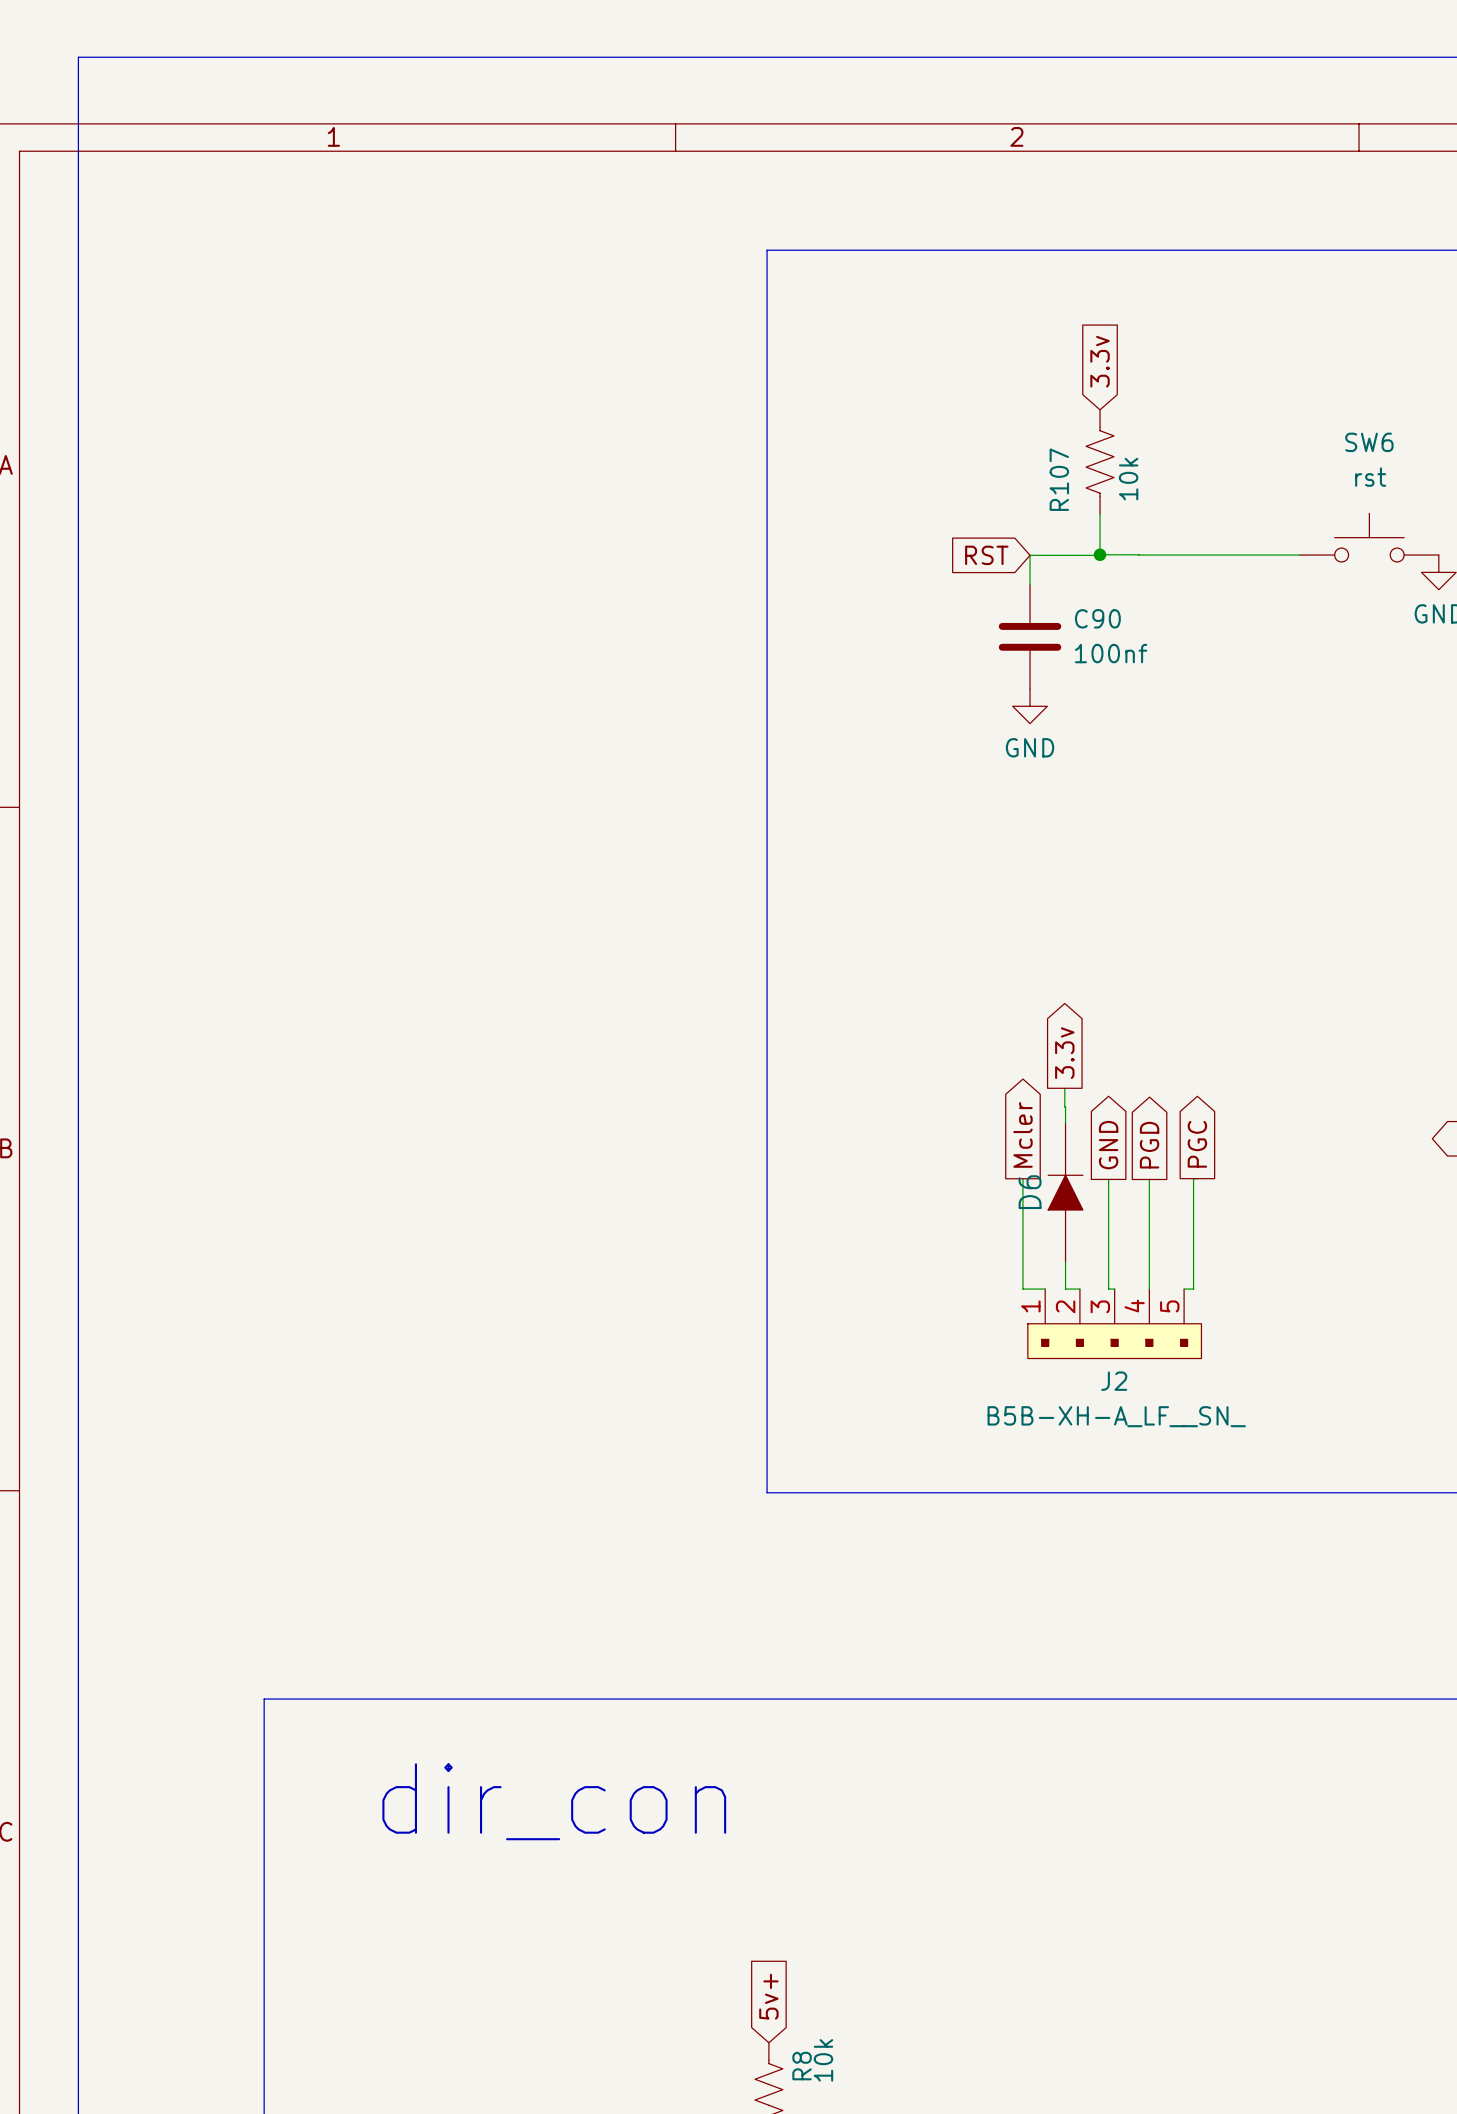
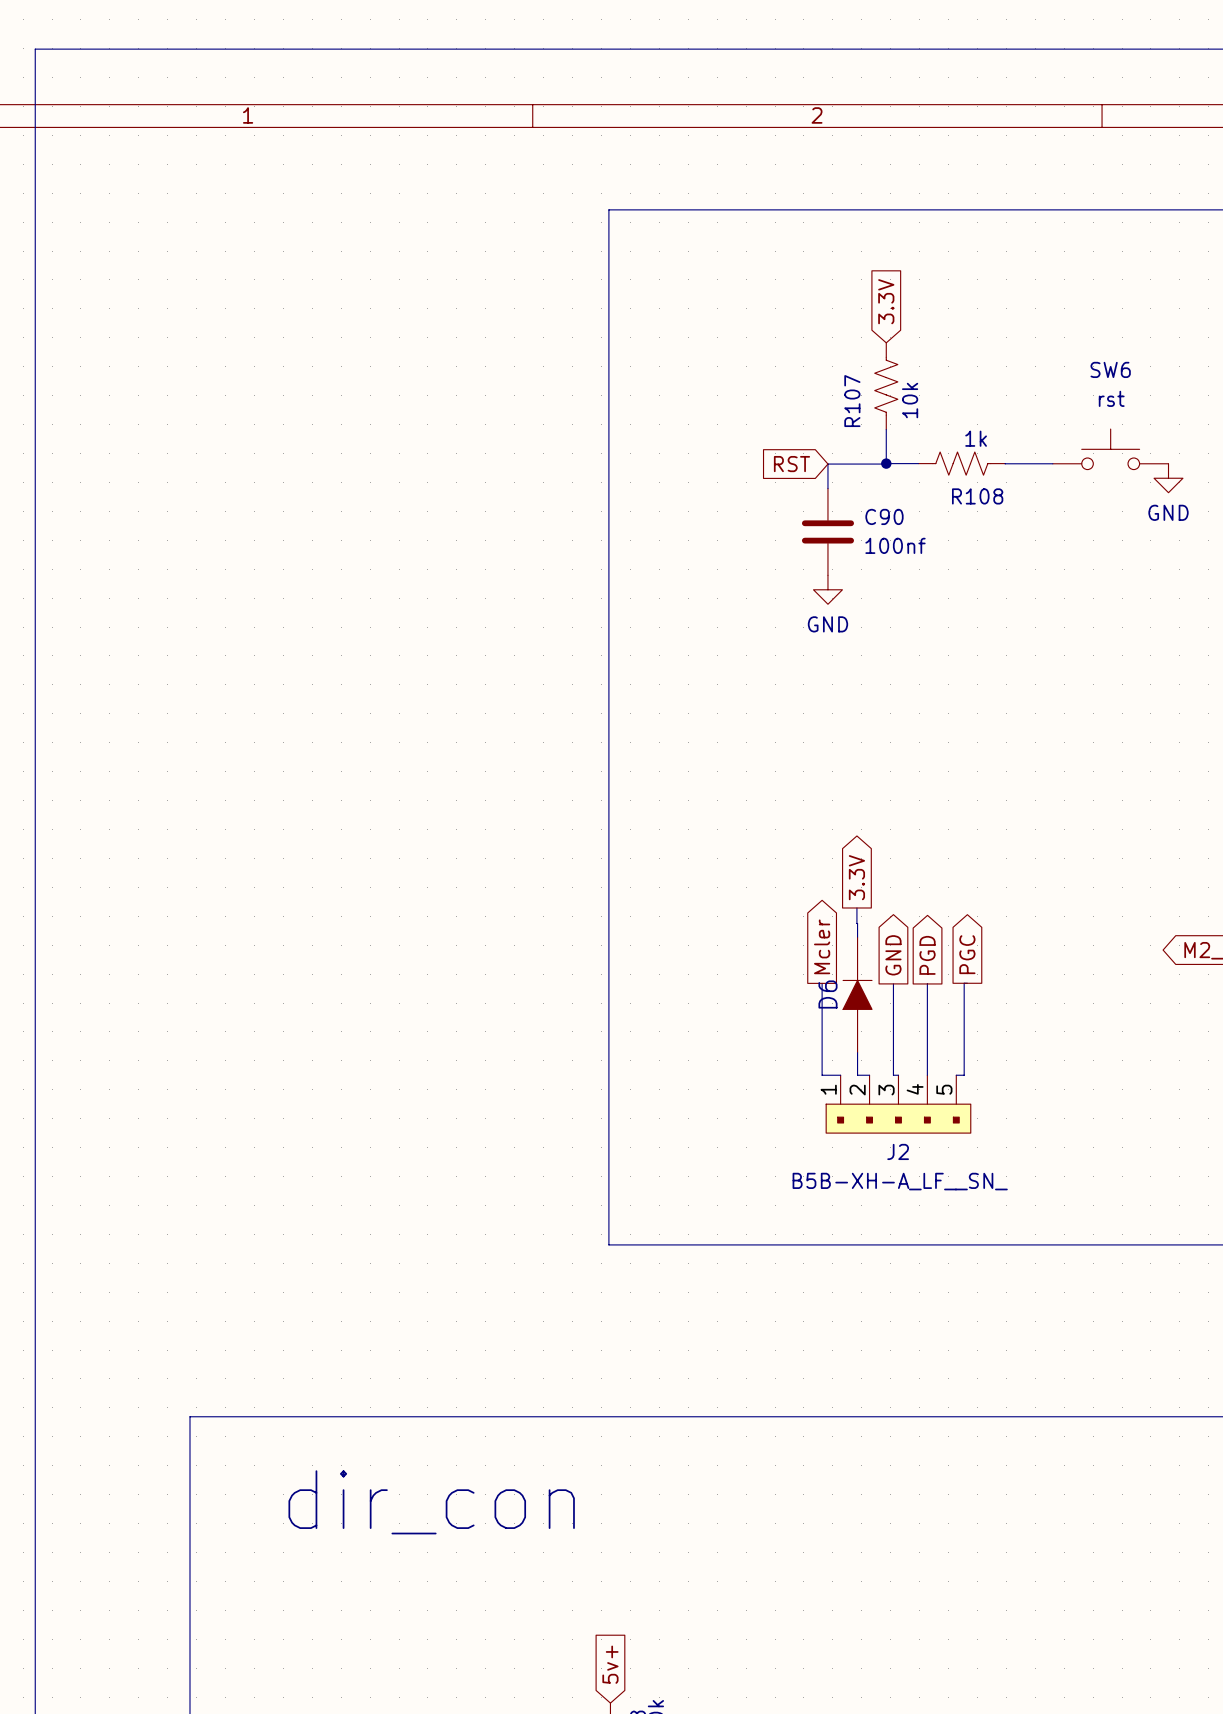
global label: 3.3v (1100, 361) -> 3.3V (886, 301)
R108: none -> 1k (961, 463)
wire: (1138, 555) (1242, 555) -> none
global label: 3.3v (1064, 1053) -> 3.3V (856, 877)

